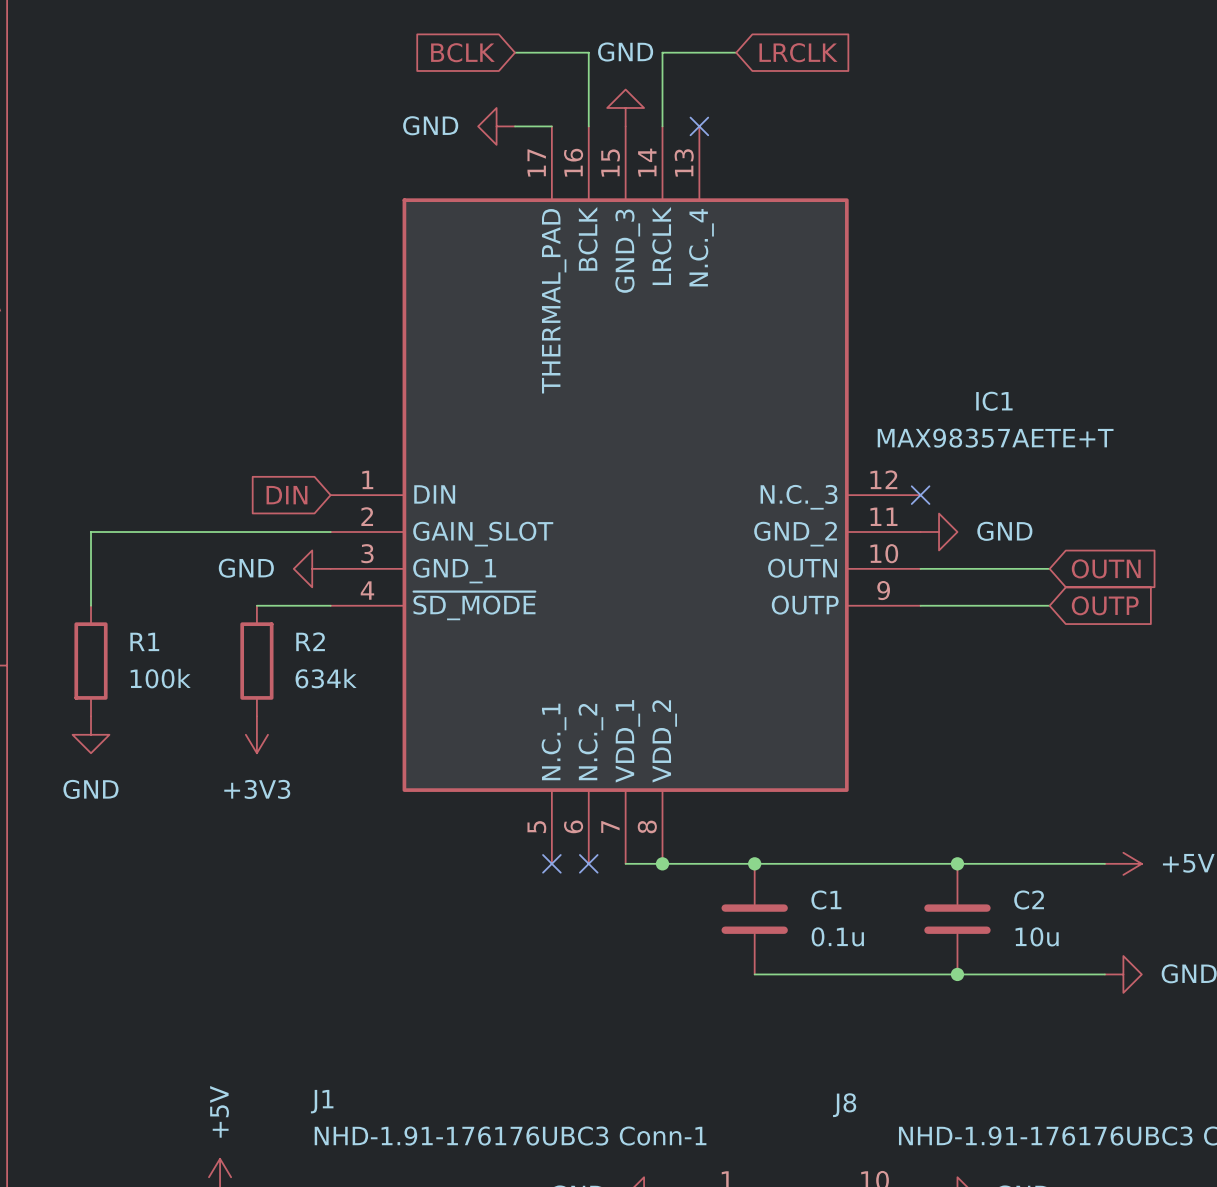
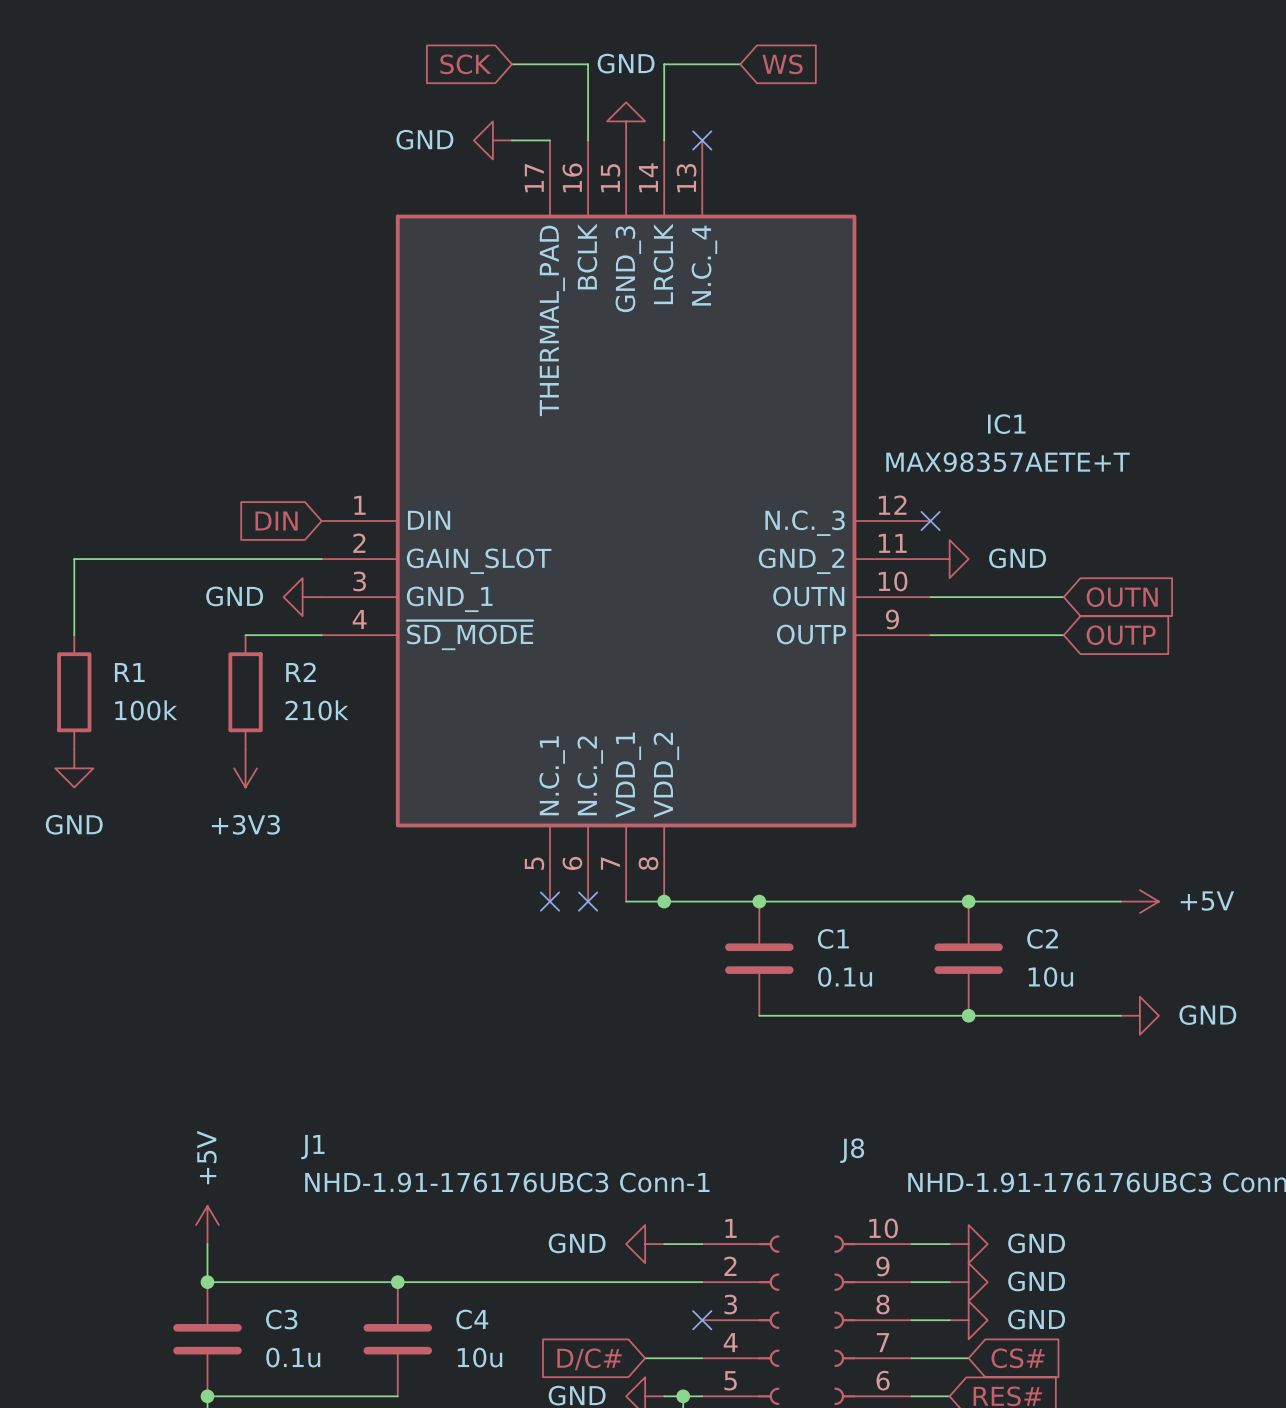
global label: BCLK (462, 52) -> SCK (465, 64)
global label: LRCLK (798, 52) -> WS (782, 64)
R2 value: 634k (326, 678) -> 210k (316, 710)

